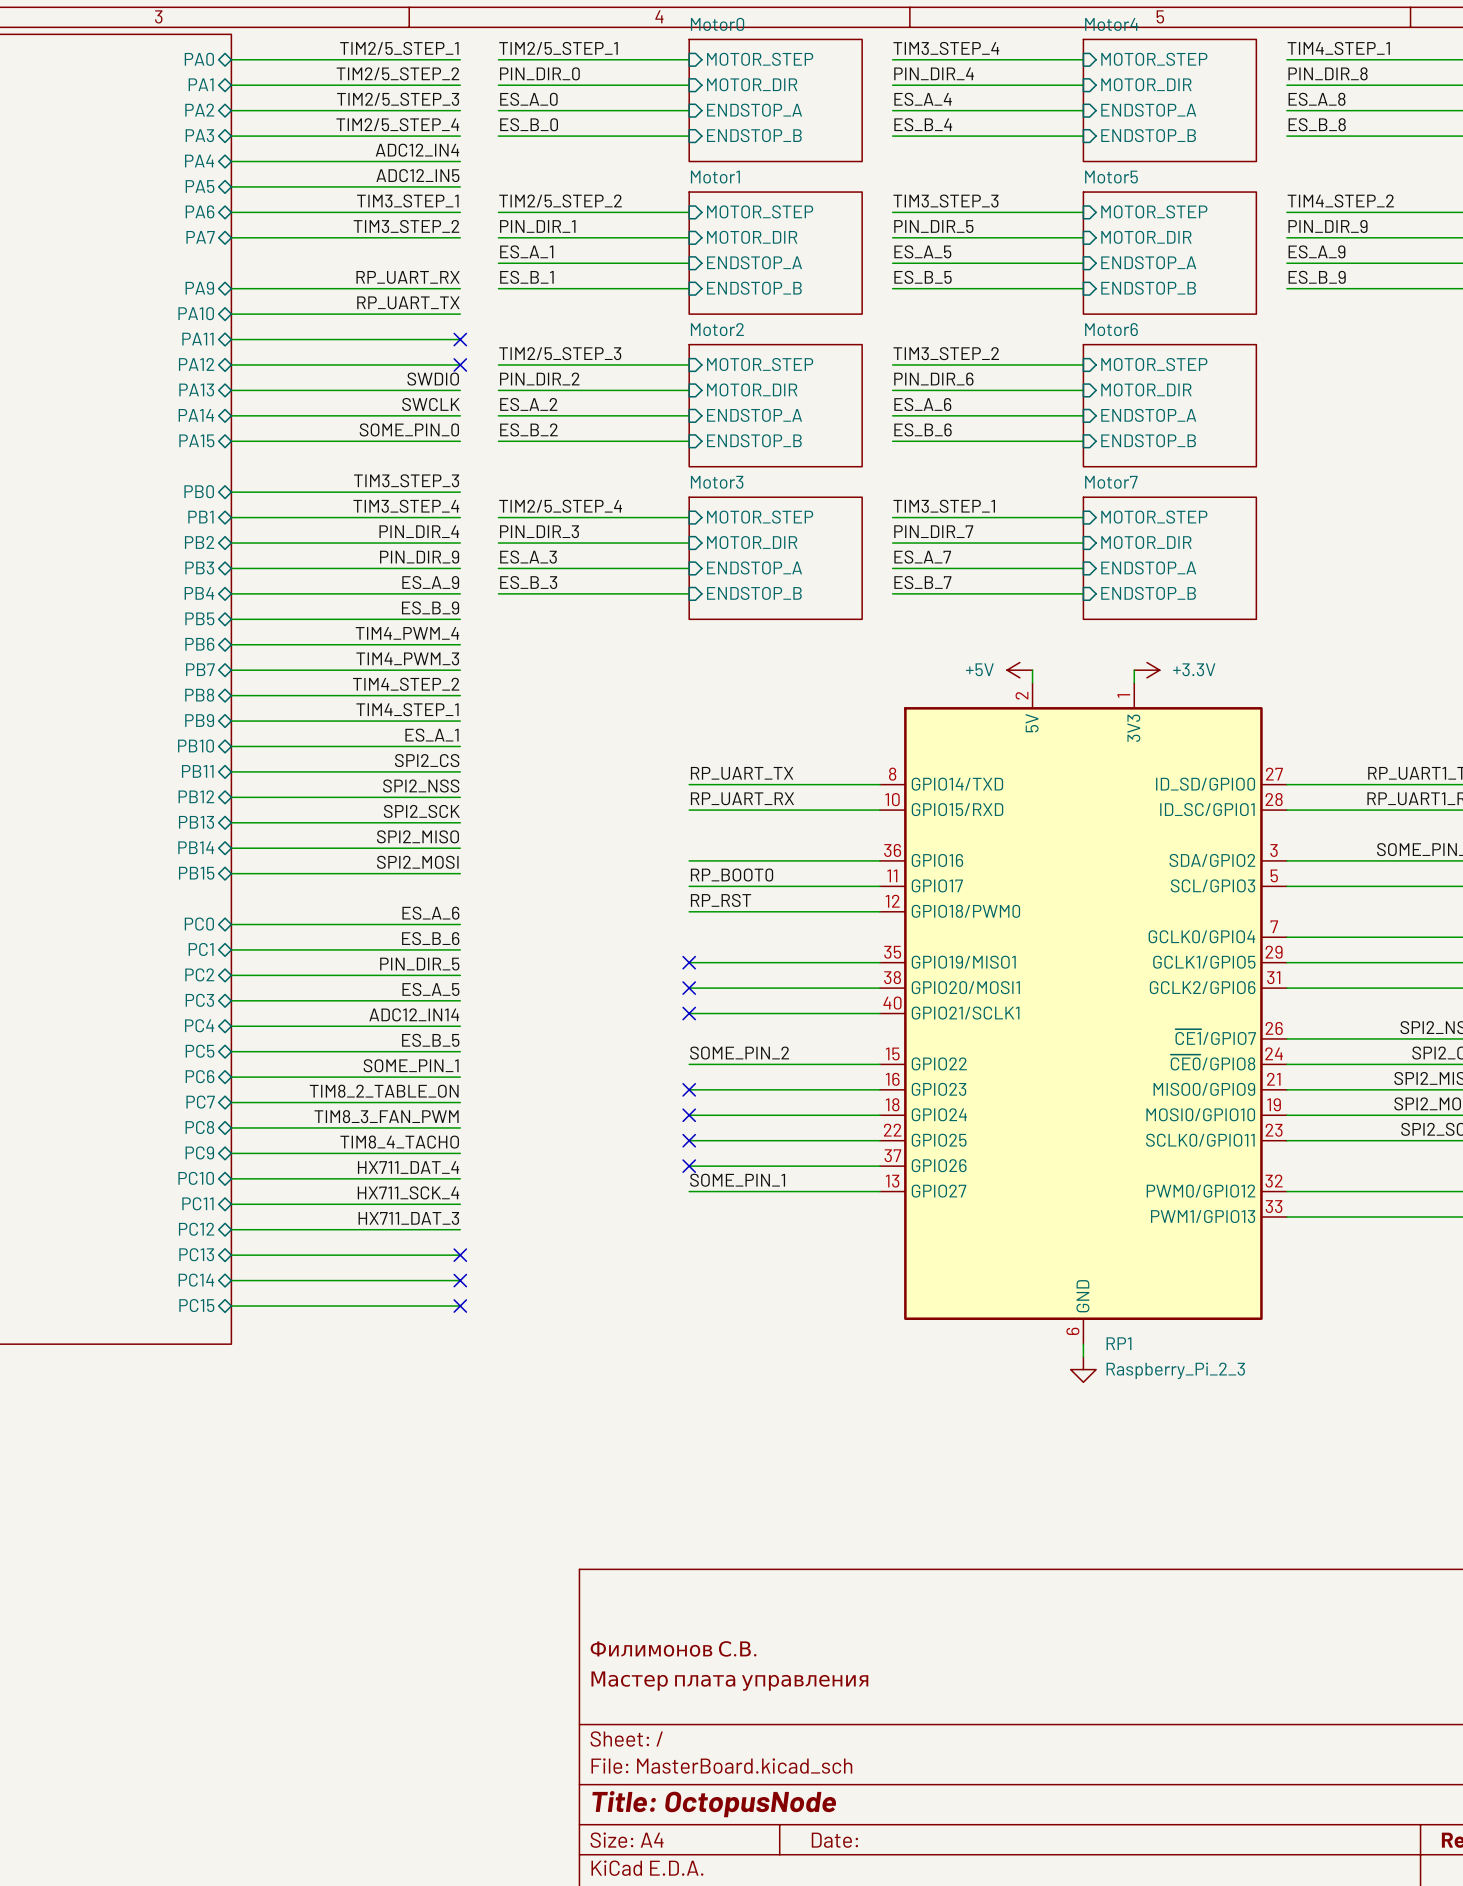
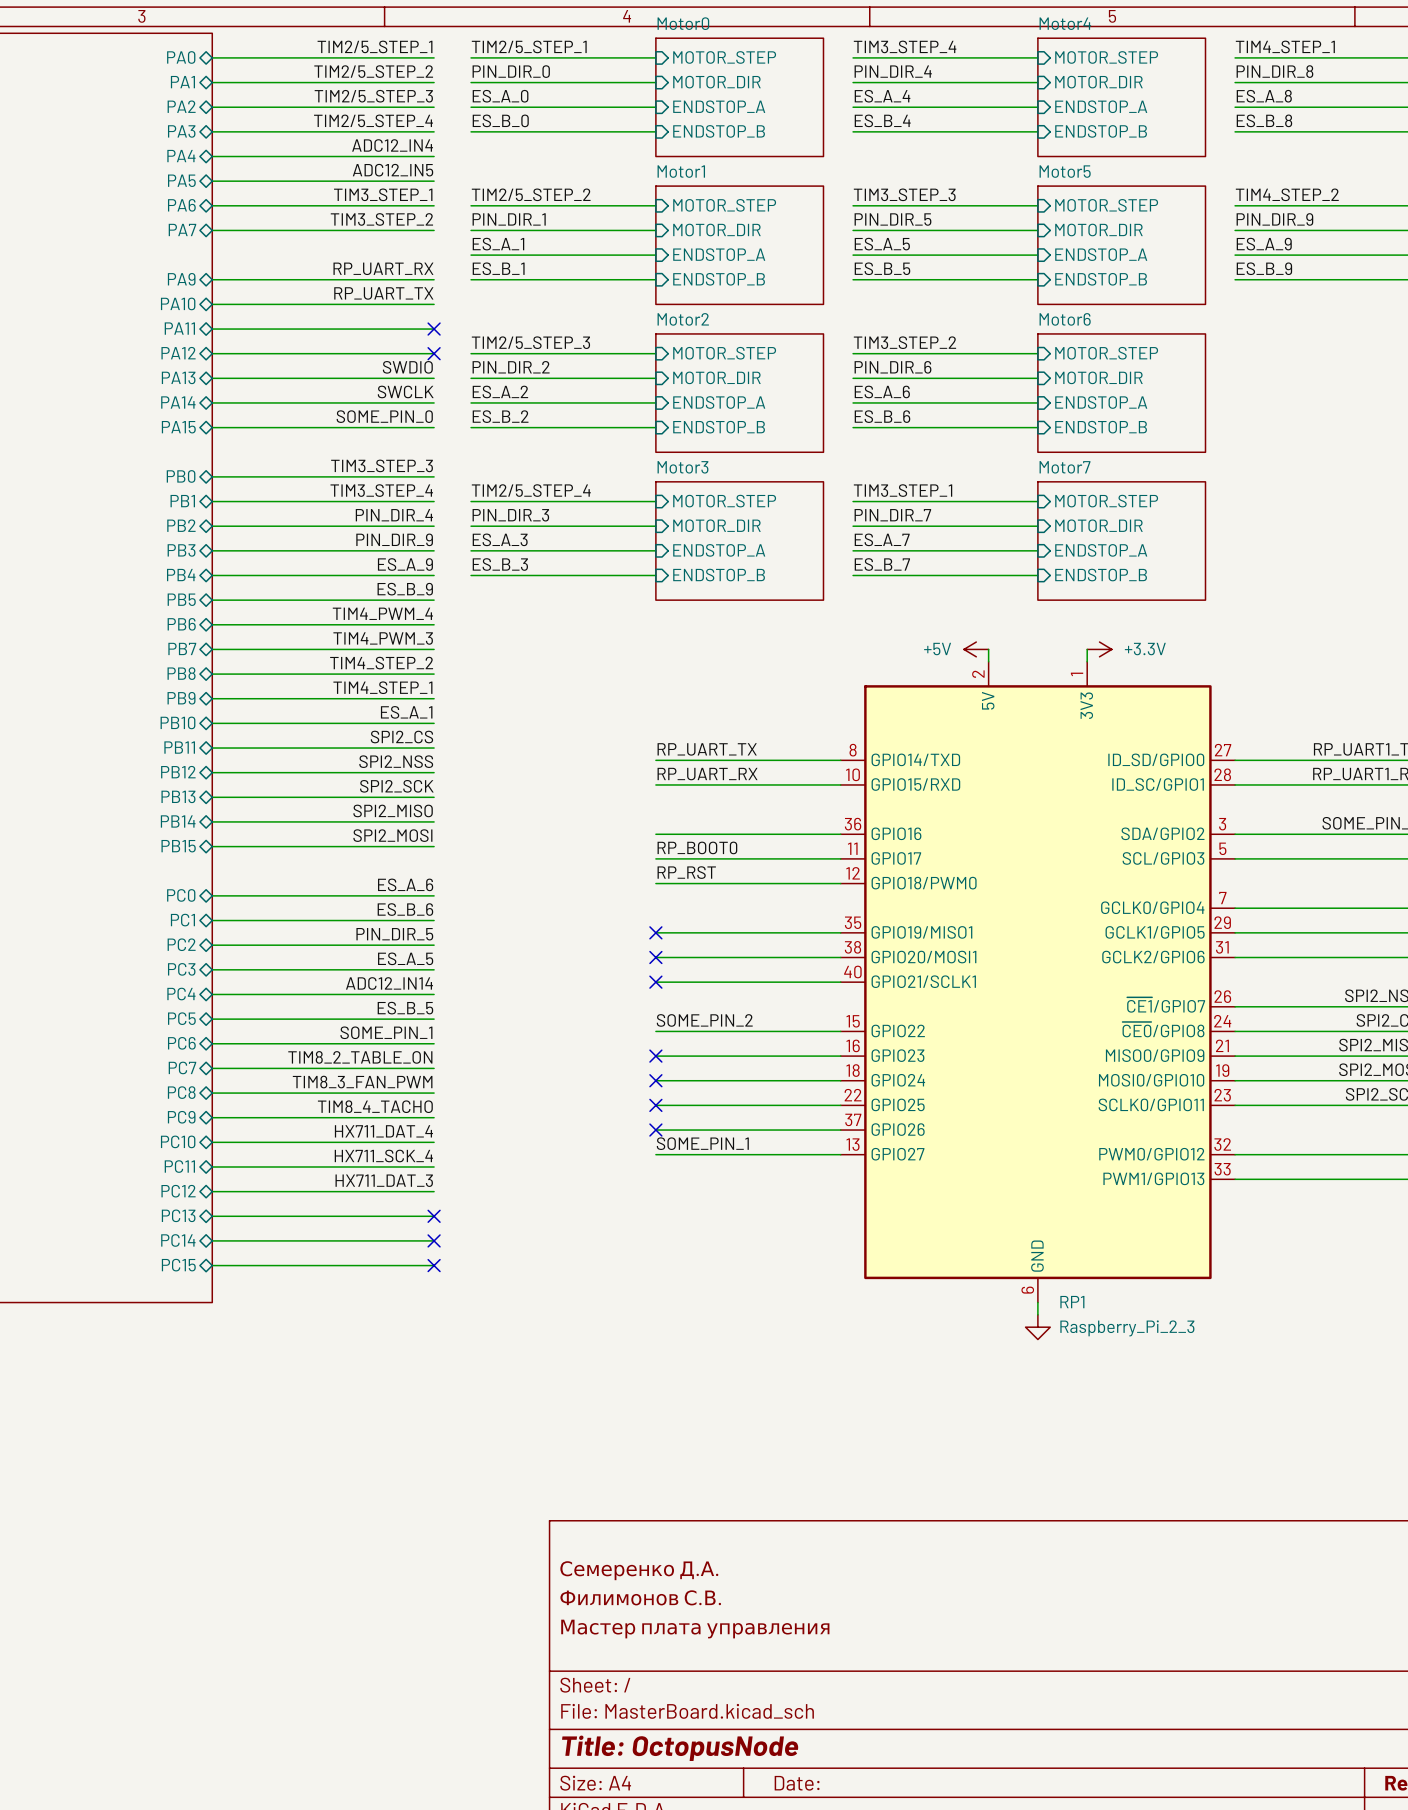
title block: none -> Семеренко Д.А. (639, 1570)

